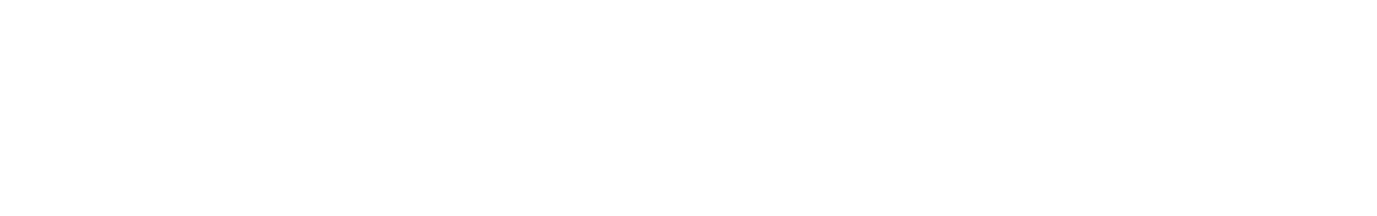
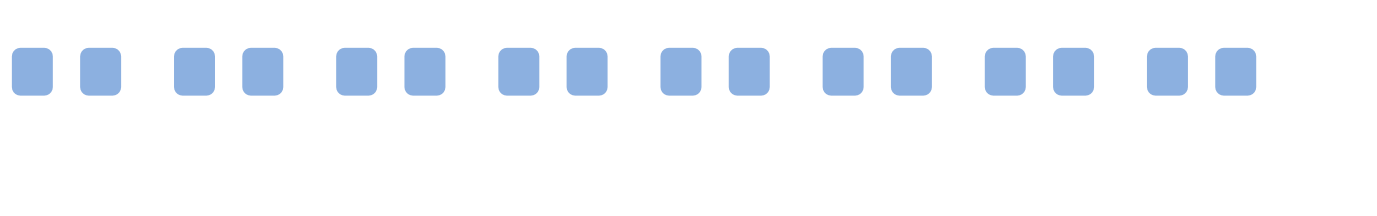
part: none -> (66, 71)
part: none -> (228, 71)
part: none -> (390, 71)
part: none -> (552, 71)
part: none -> (715, 71)
part: none -> (877, 71)
part: none -> (1039, 71)
part: none -> (1201, 71)

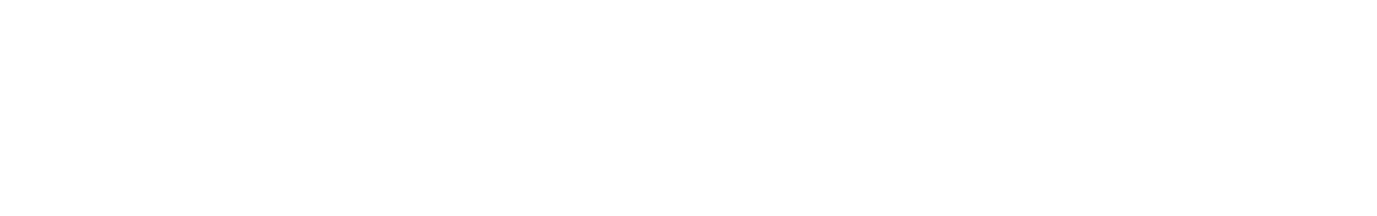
part: (66, 71) -> none
part: (228, 71) -> none
part: (390, 71) -> none
part: (552, 71) -> none
part: (715, 71) -> none
part: (877, 71) -> none
part: (1039, 71) -> none
part: (1201, 71) -> none

